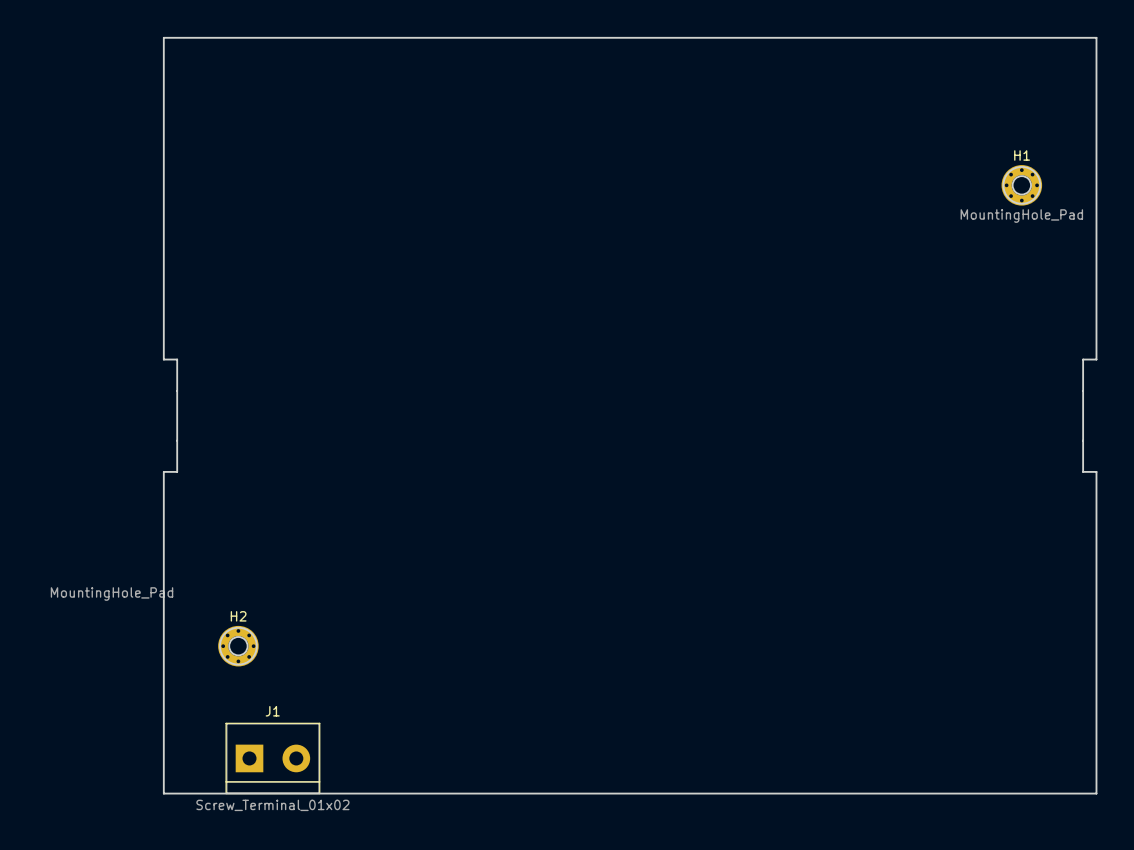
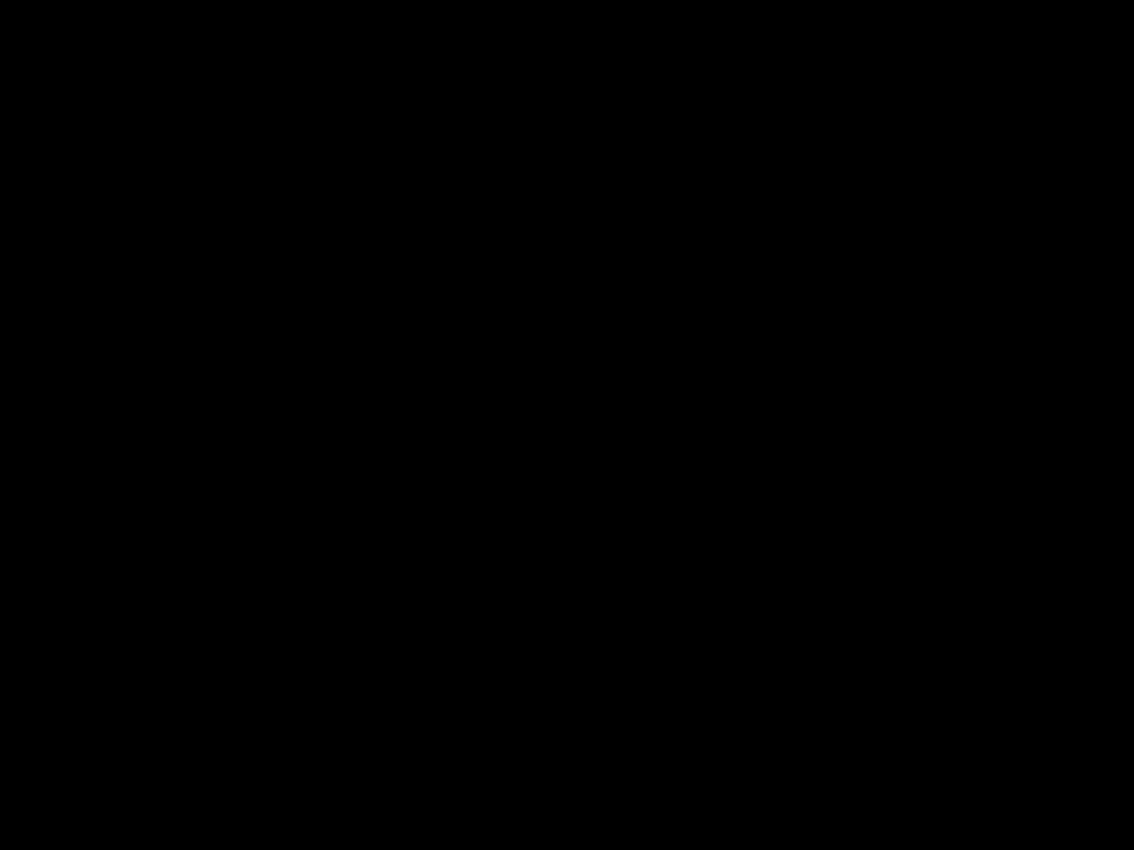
board edge: (163, 37) (1096, 37) (1096, 359) (1083, 359) (1083, 471) (1096, 471) (1096, 793) (163, 793) (163, 471) (177, 471) (177, 359) (163, 359) (163, 37) -> none
round board edge: [1002, 165, 1042, 205] -> none
round board edge: [1011, 175, 1032, 196] -> none
H1: MountingHole_Pad (1021, 185) -> none
round board edge: [219, 626, 258, 666] -> none
round board edge: [228, 636, 249, 657] -> none
H2: MountingHole_Pad (238, 646) -> none
J1: Screw_Terminal_01x02 (272, 758) -> none

